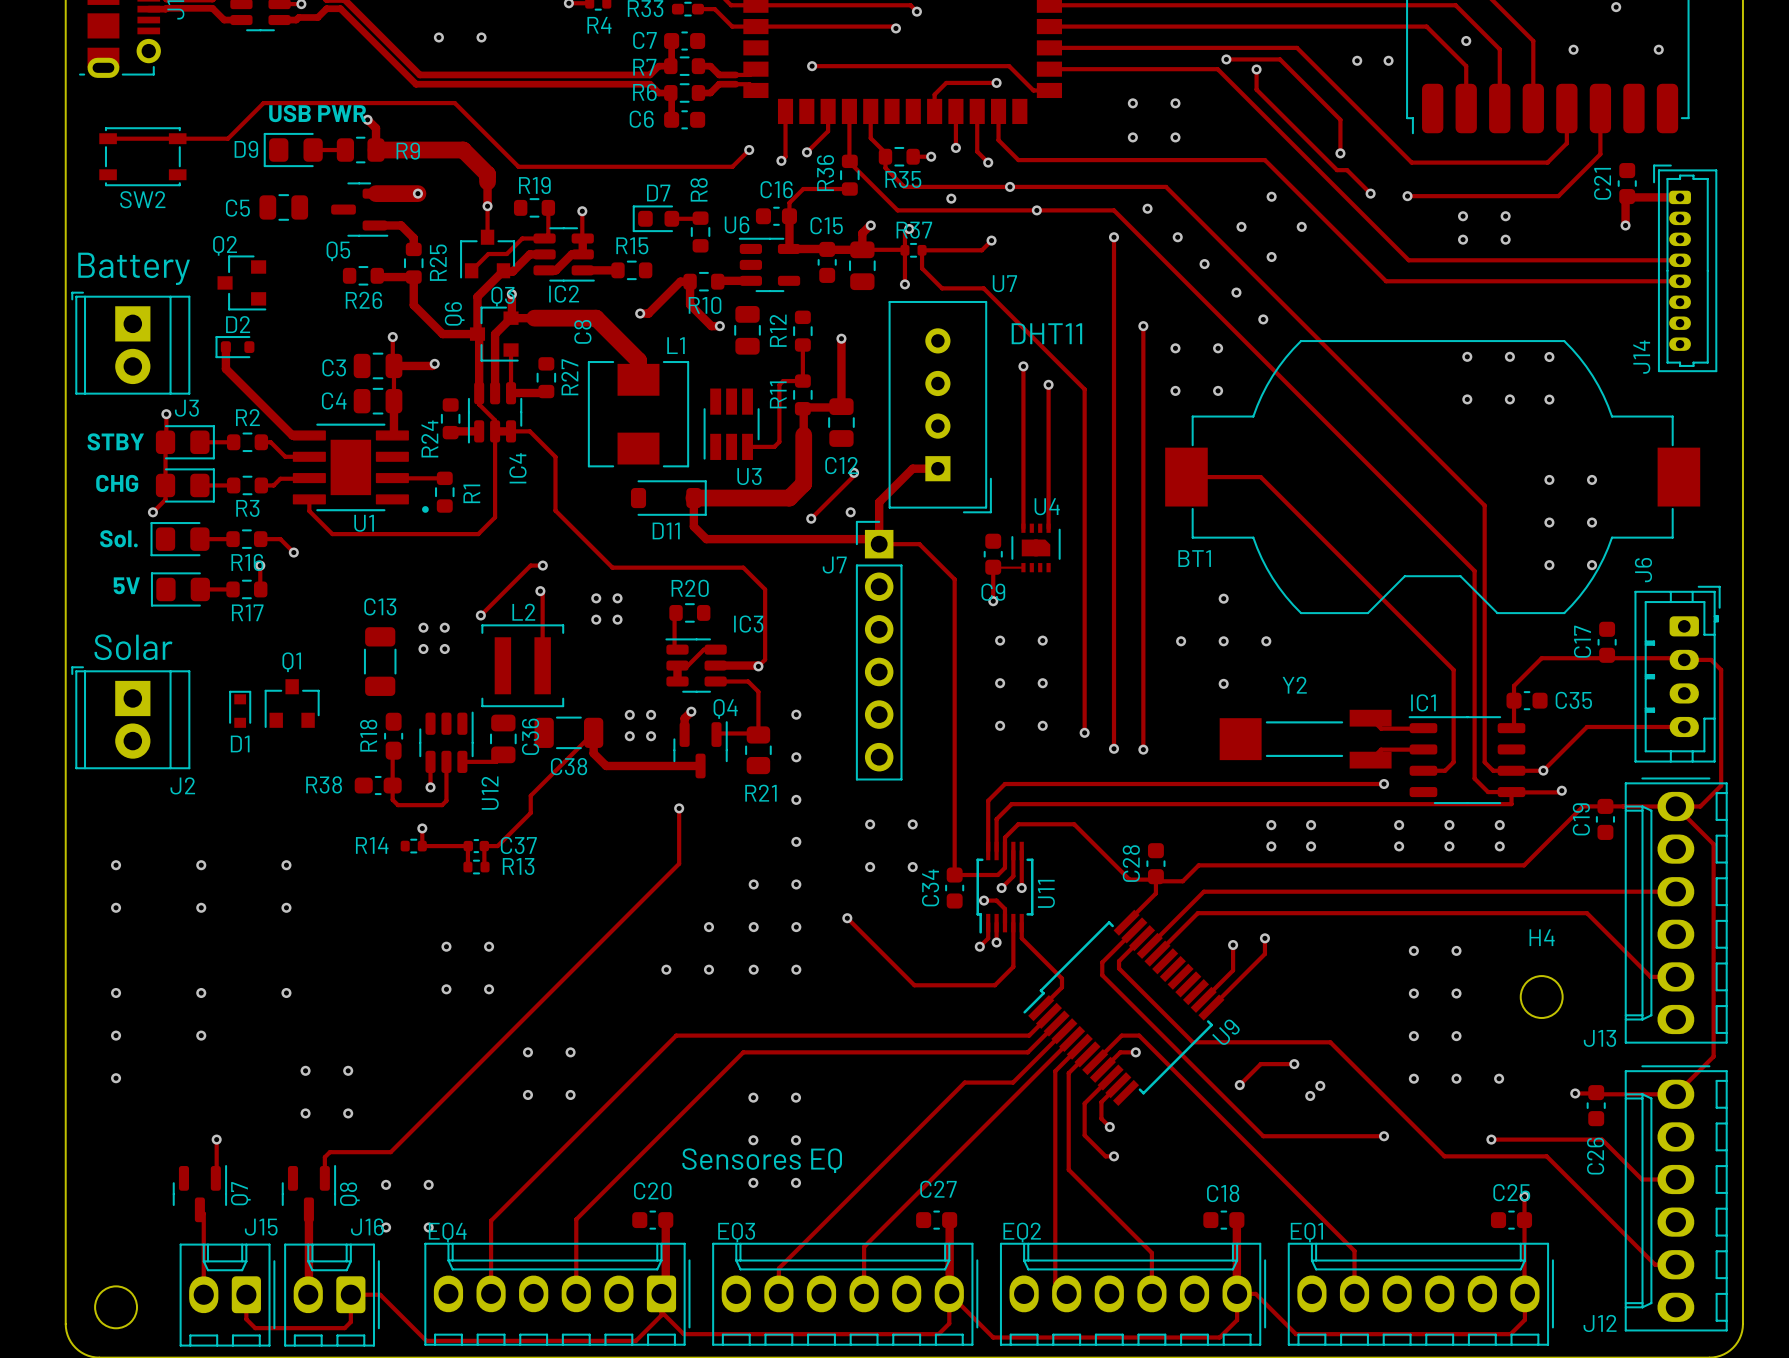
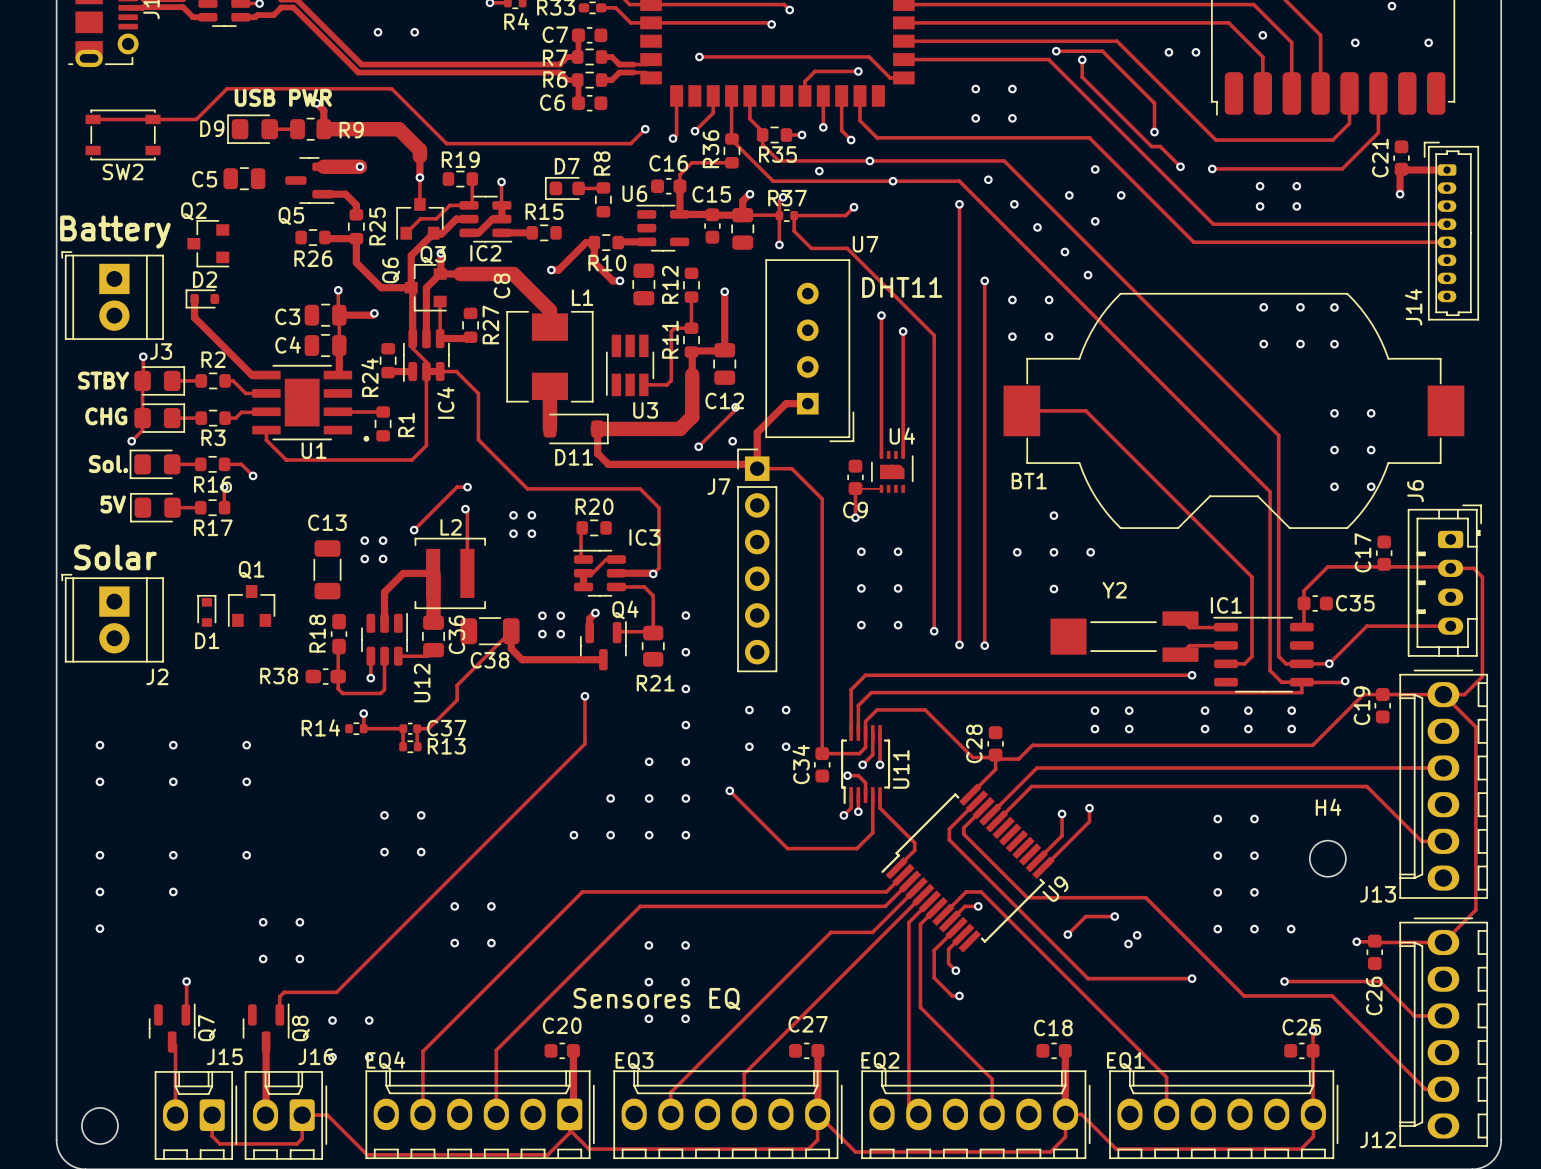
track: none -> (549, 386) (549, 428)
track: none -> (433, 622) (433, 573) (403, 573) (384, 592) (384, 623)

